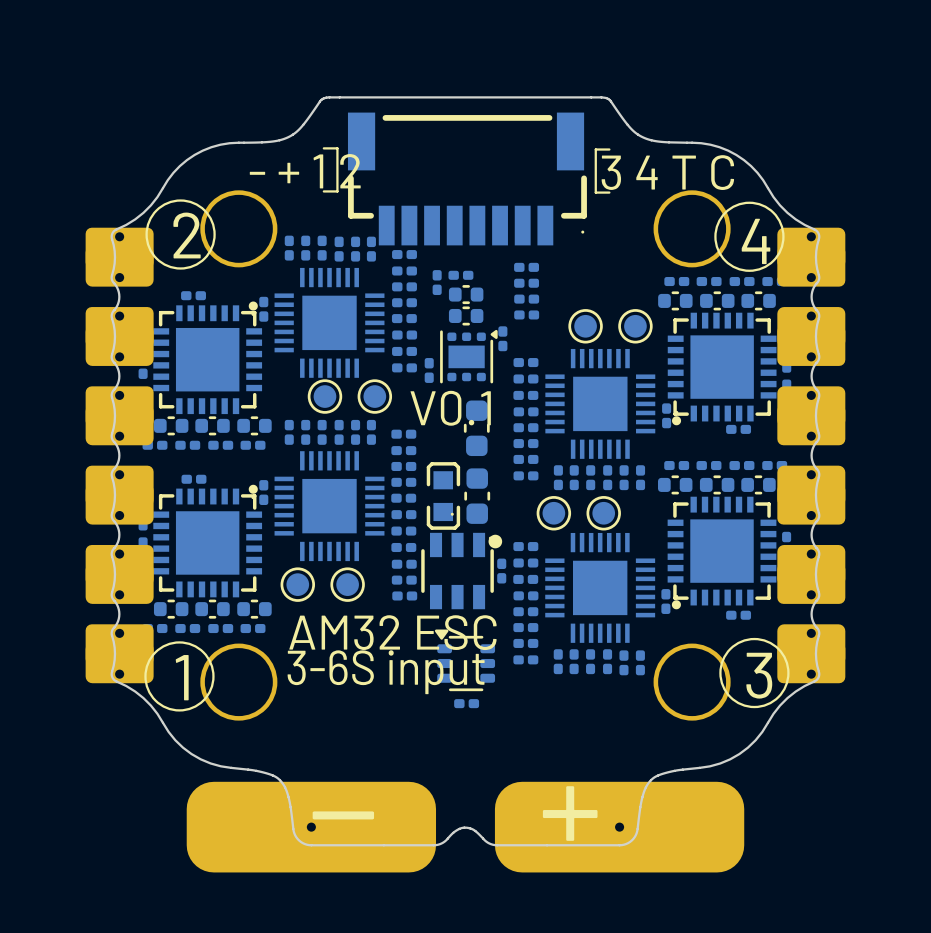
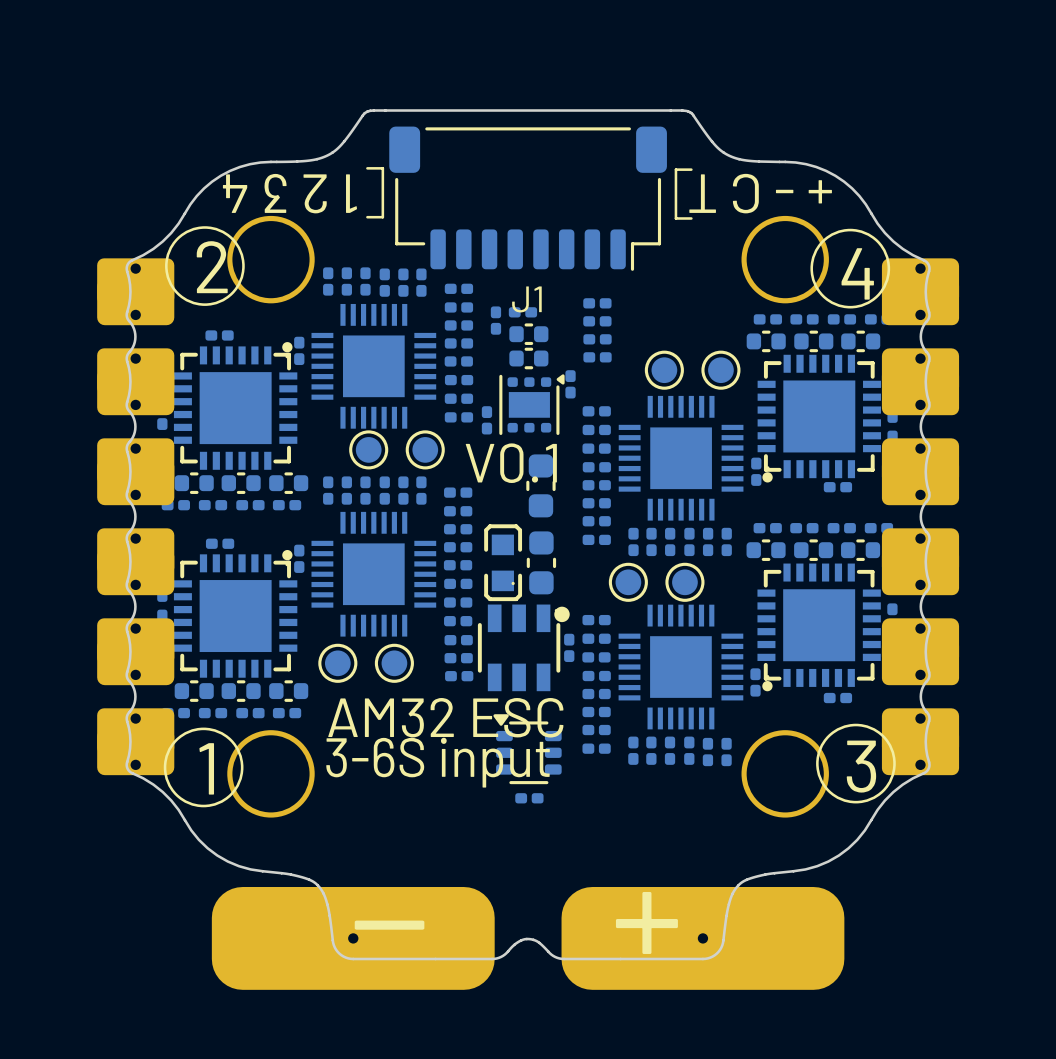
text: none -> 1 2 3 4 (289, 193)
text: none -> + - C T (760, 193)
text: - + 1 2 (305, 171) -> none
text: 3 4 T C (667, 172) -> none
J1: none -> (528, 198)
part: (467, 178) -> none

